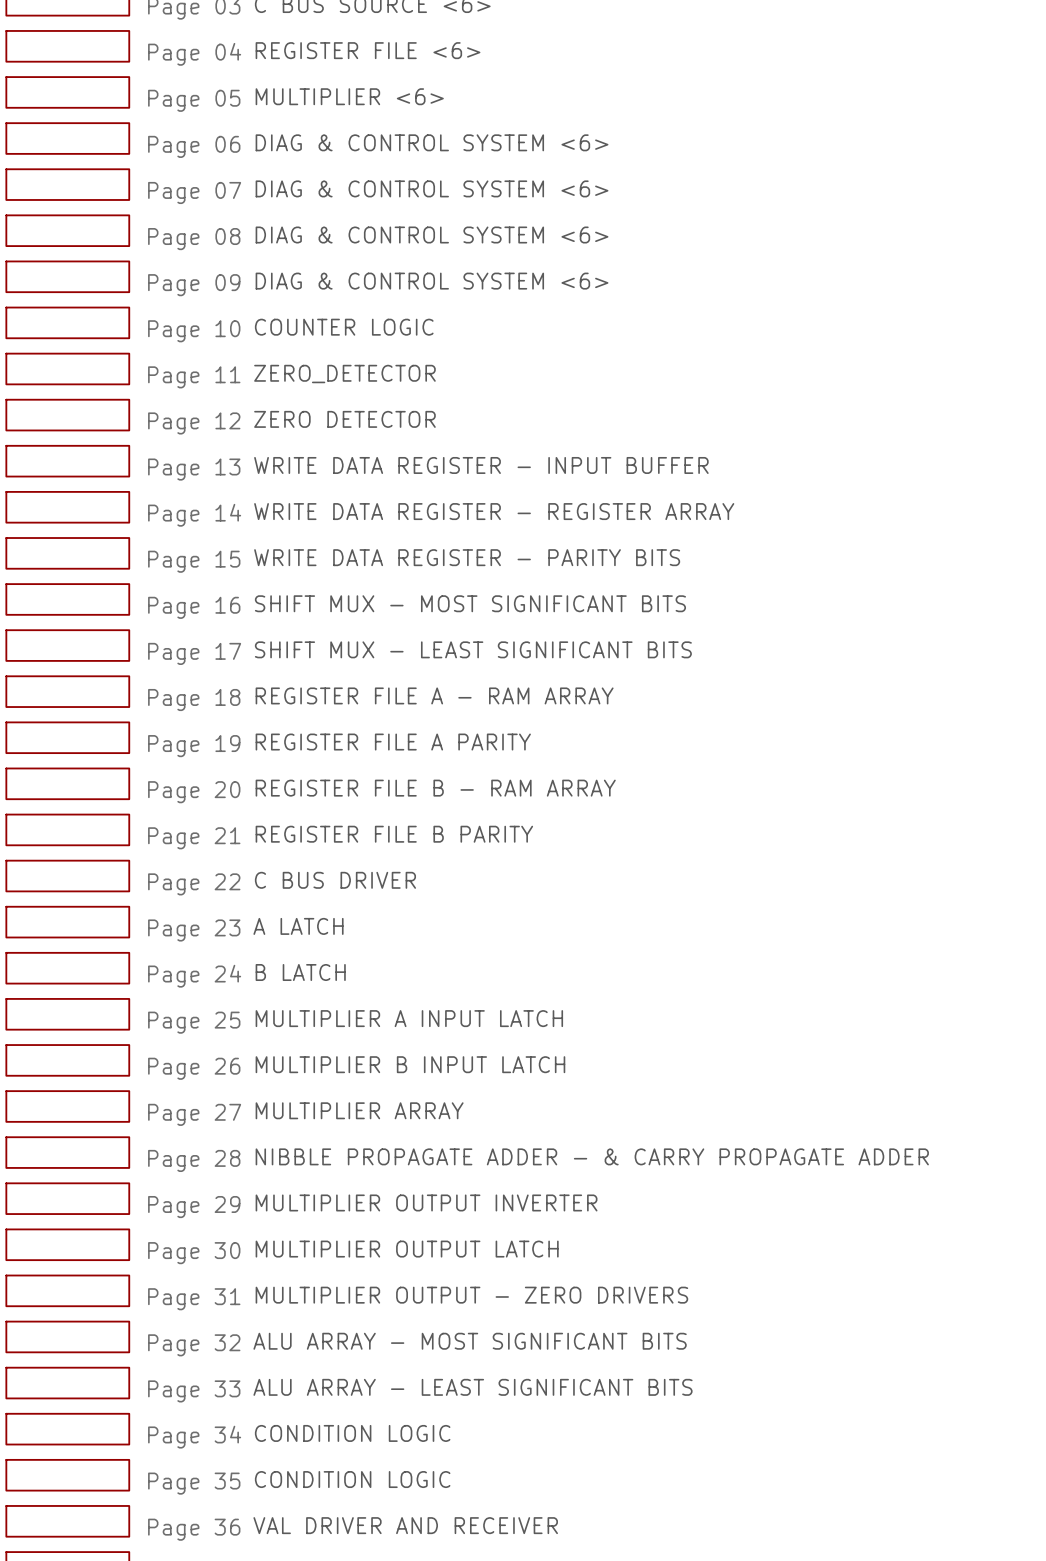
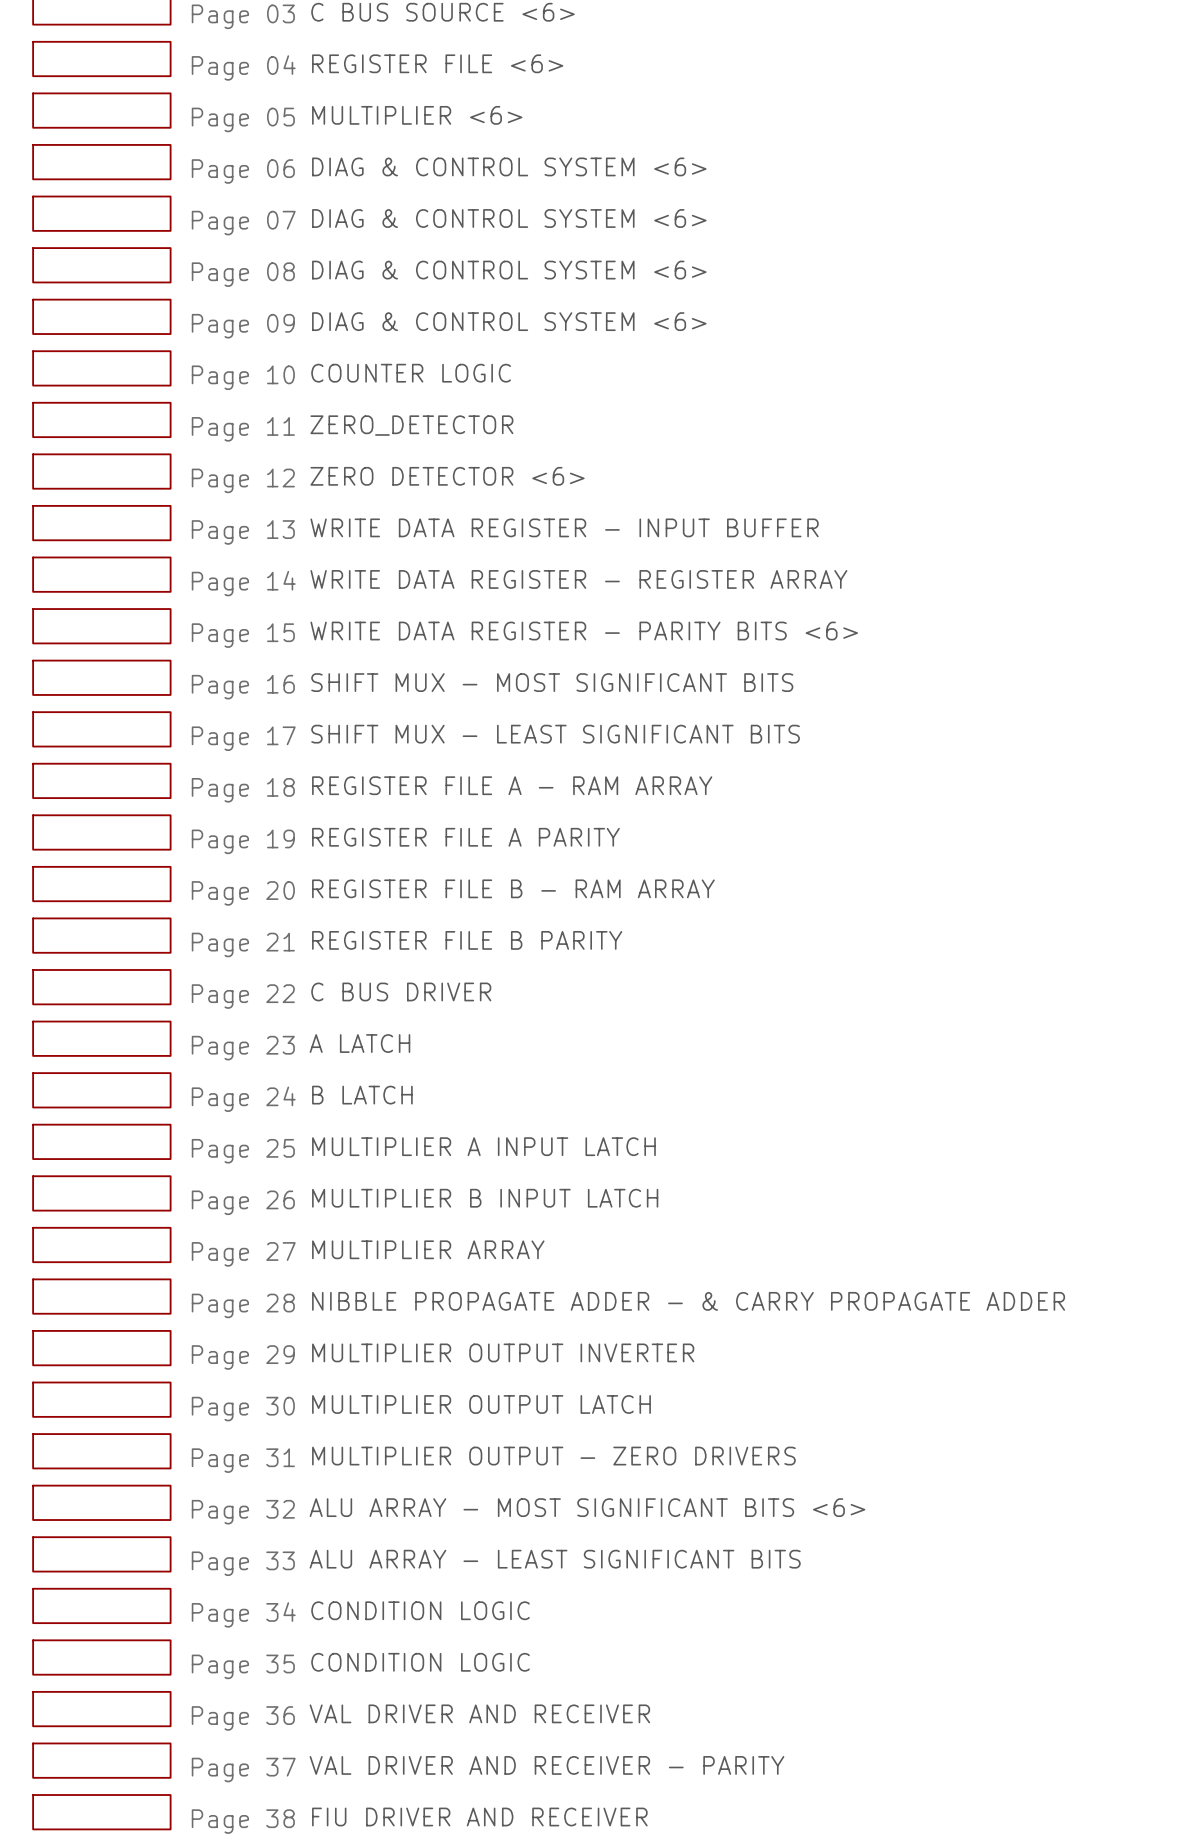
text: ZERO DETECTOR (344, 419) -> ZERO DETECTOR <6> (447, 476)
text: WRITE DATA REGISTER - PARITY BITS (467, 557) -> WRITE DATA REGISTER - PARITY BITS <6> (584, 631)
text: ALU ARRAY - MOST SIGNIFICANT BITS (470, 1341) -> ALU ARRAY - MOST SIGNIFICANT BITS <6> (587, 1507)

